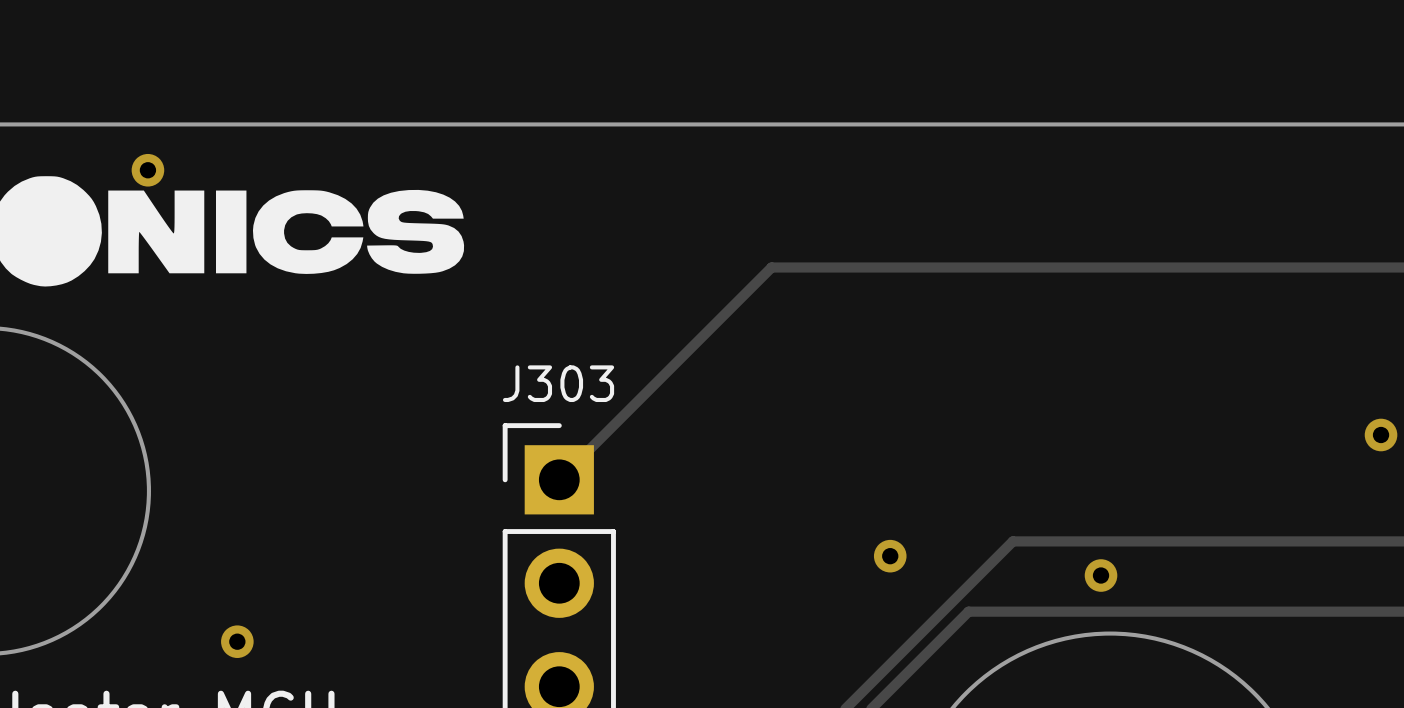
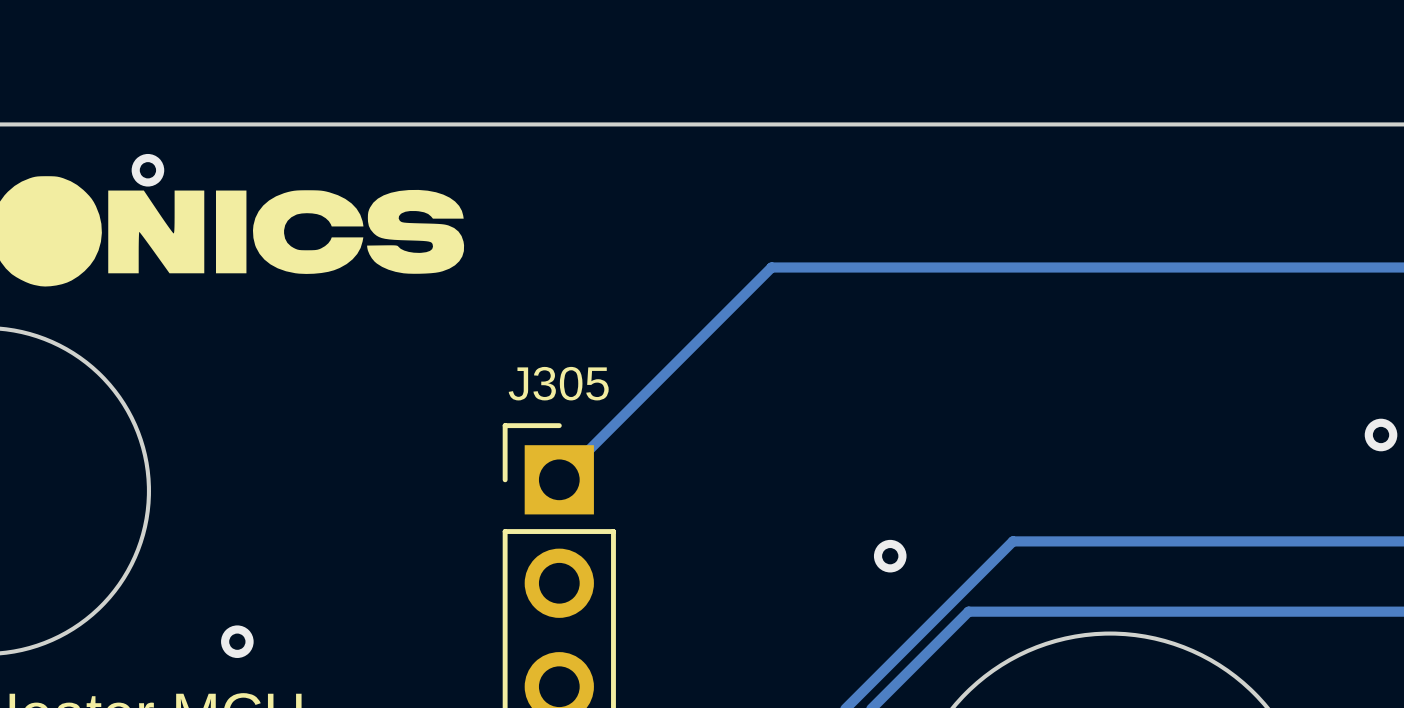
J303 name: J303 (558, 383) -> J305 (558, 383)
via: (1101, 575) -> none

